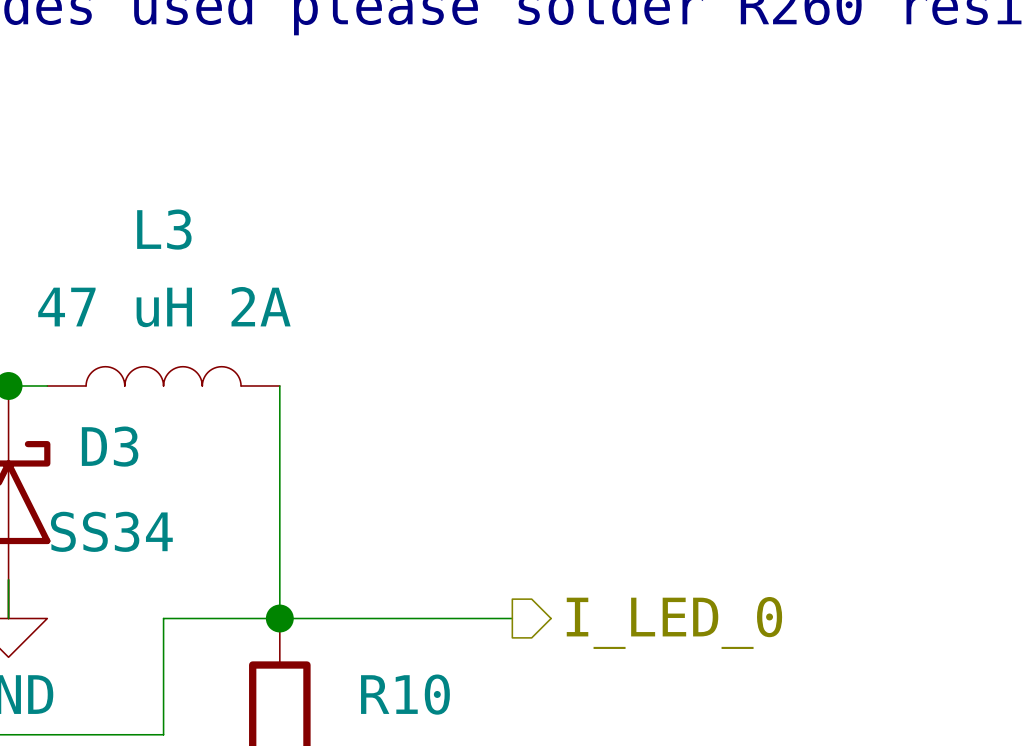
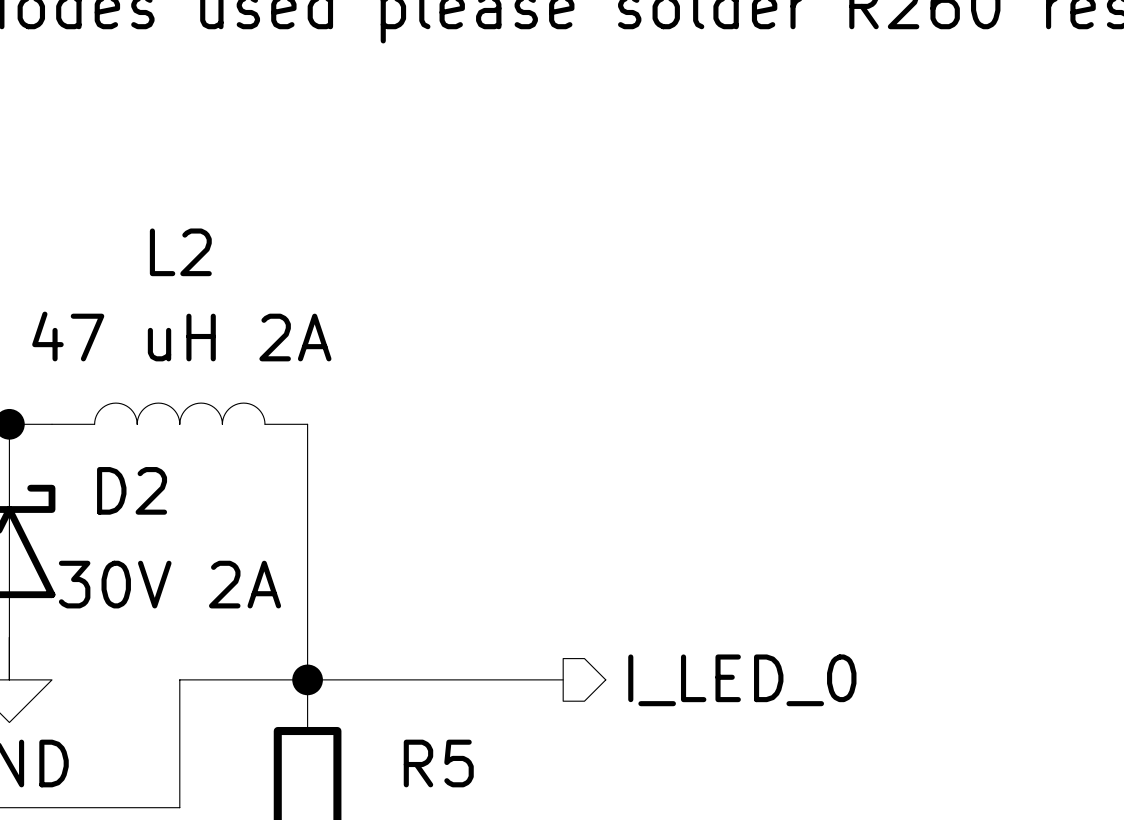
L3 name: L3 (164, 229) -> L2 (180, 252)
D3 name: D3 (110, 446) -> D2 (132, 490)
D3 value: SS34 (111, 531) -> 30V 2A (169, 584)
R10 name: R10 (405, 694) -> R5 (438, 763)

